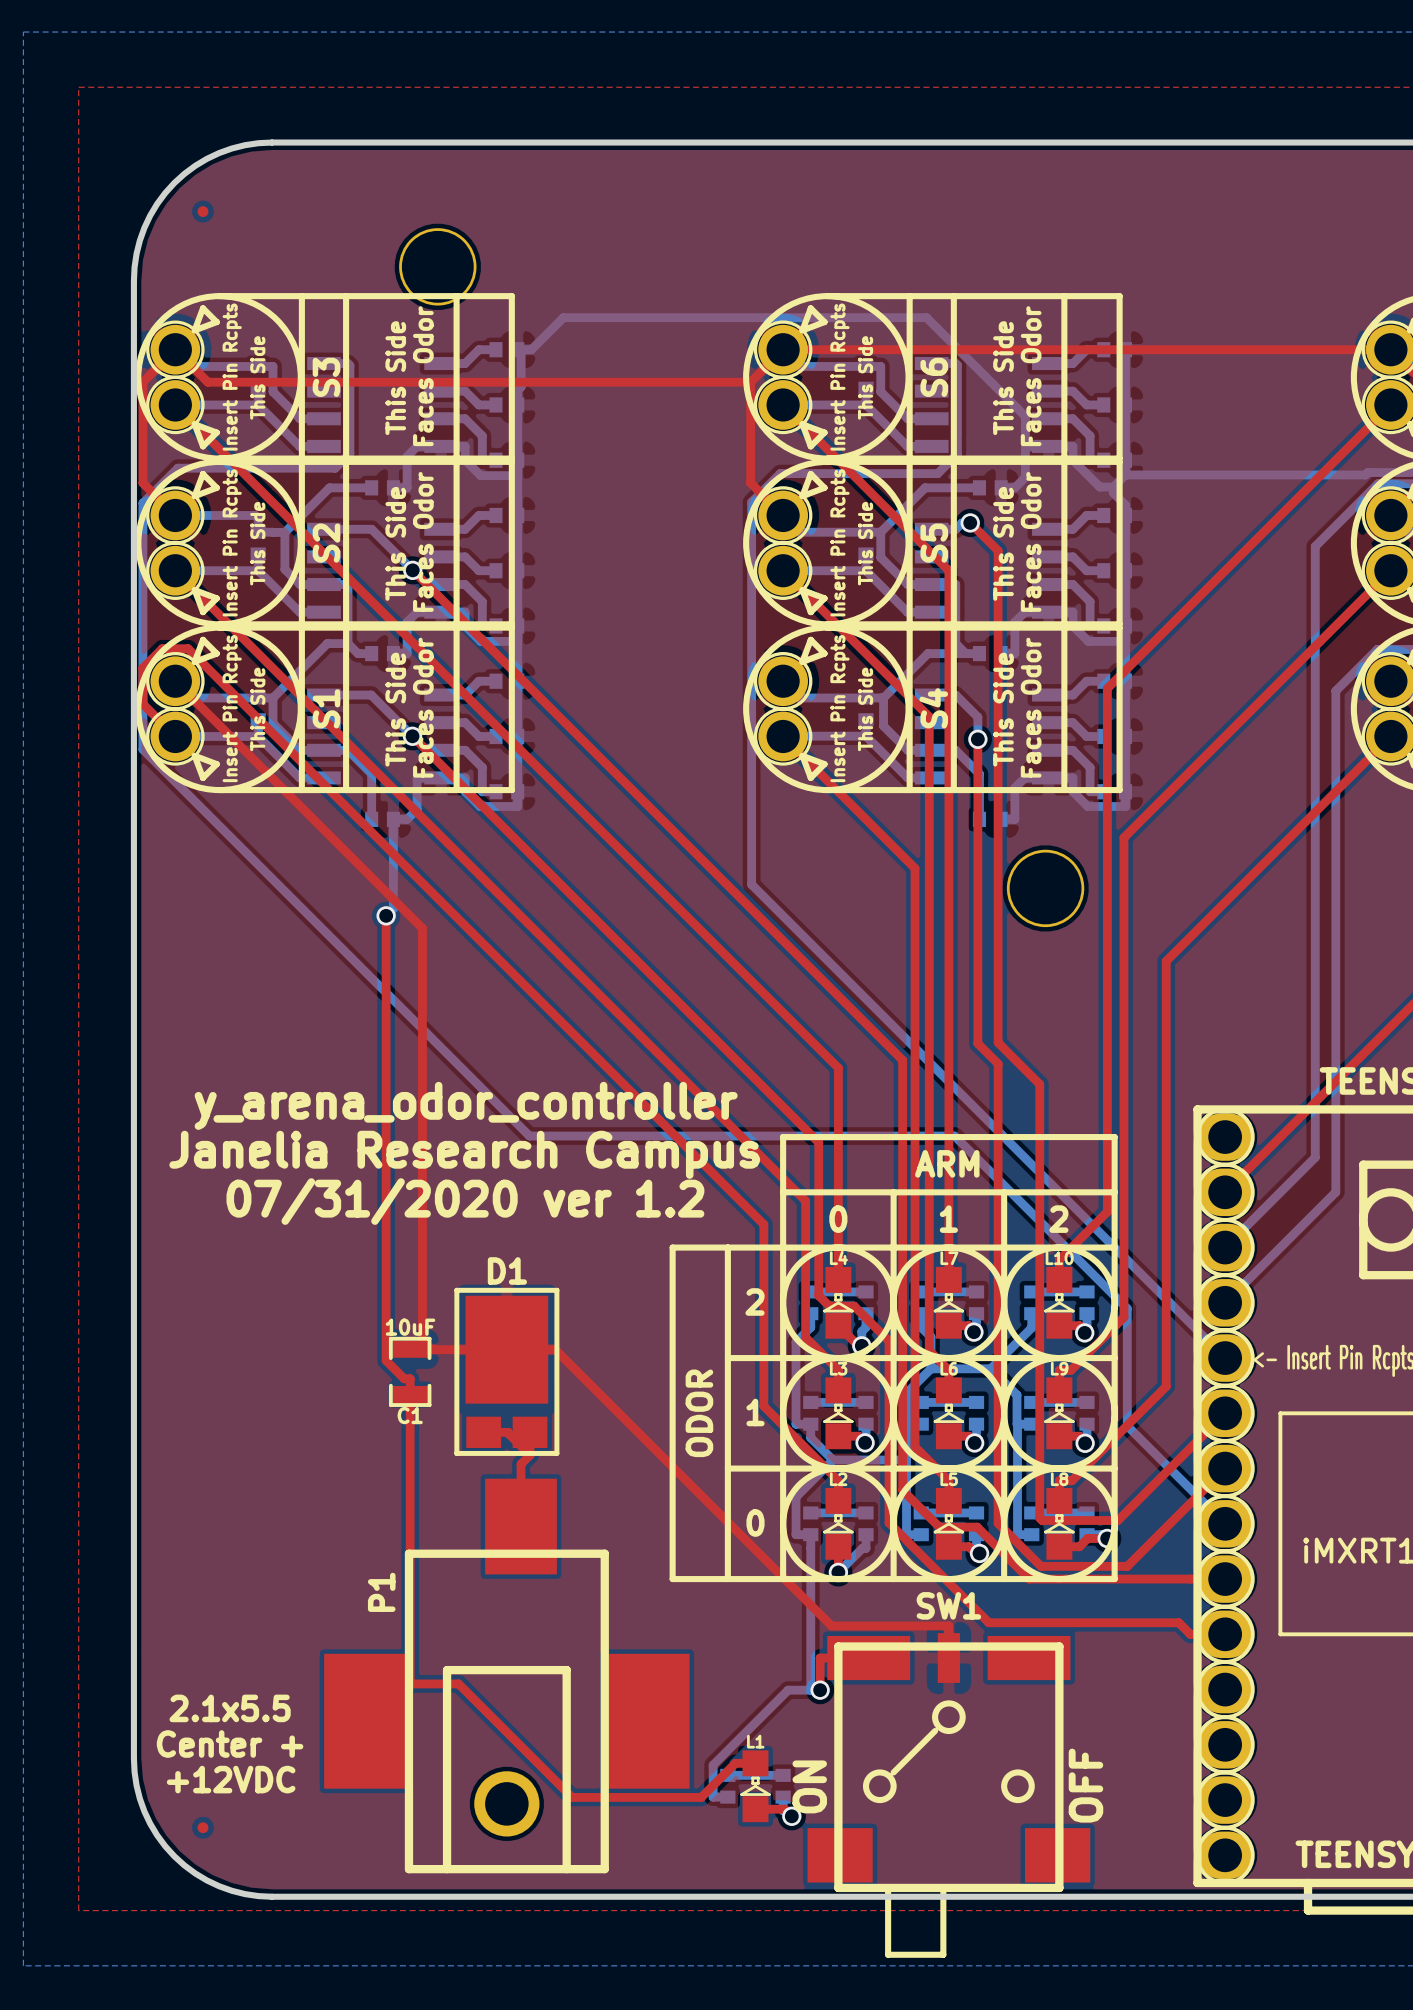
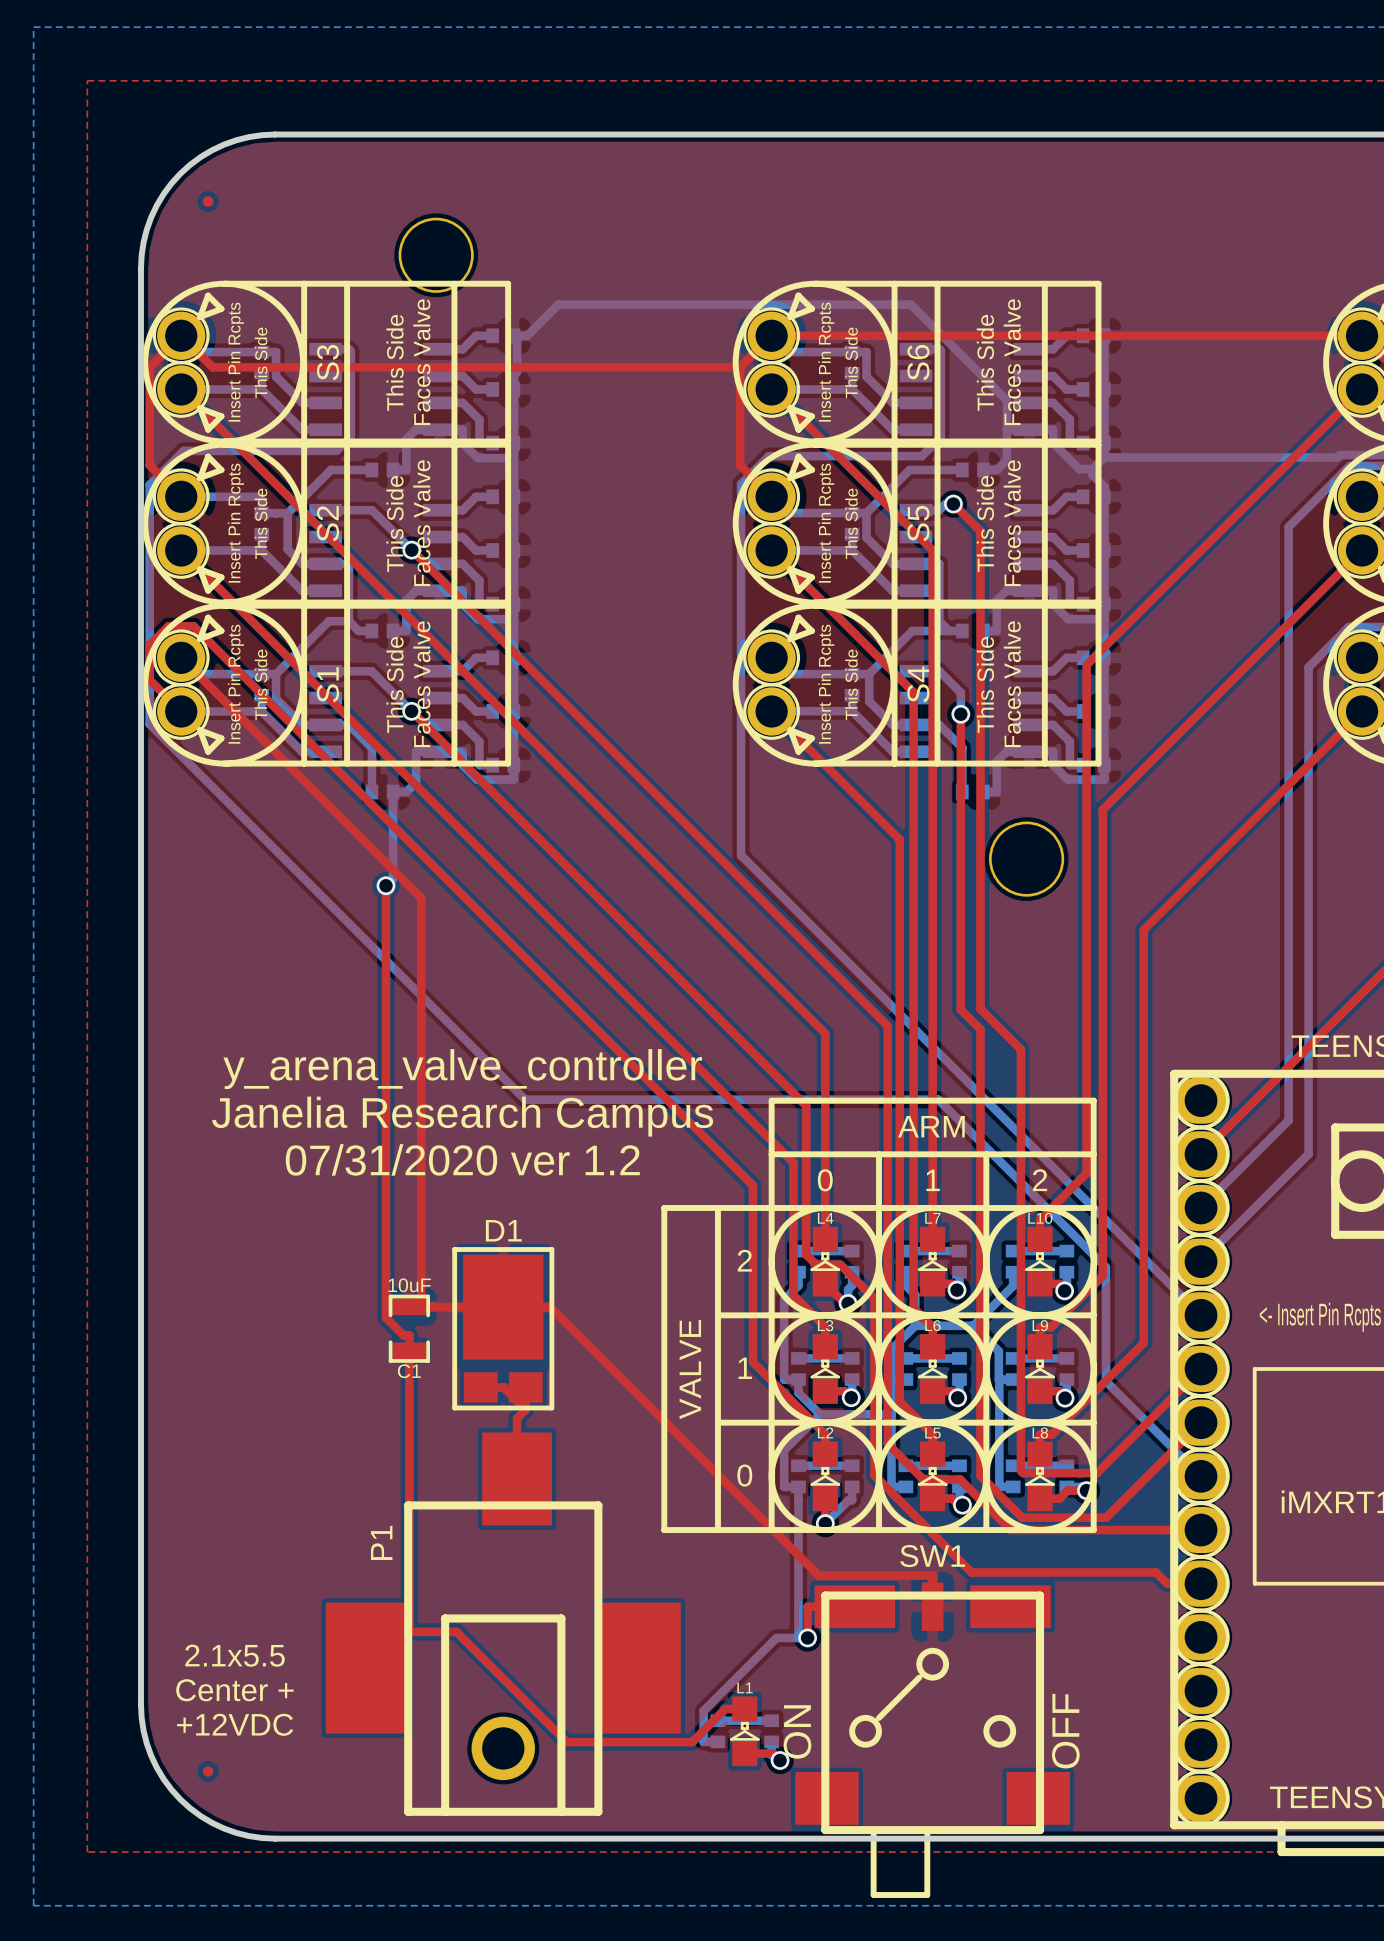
S3 text: Faces Odor (423, 376) -> Faces Valve (421, 362)
S6 text: Faces Odor (1031, 376) -> Faces Valve (1012, 362)
S2 text: Faces Odor (423, 541) -> Faces Valve (421, 523)
S5 text: Faces Odor (1031, 541) -> Faces Valve (1012, 523)
S1 text: Faces Odor (423, 707) -> Faces Valve (421, 684)
S4 text: Faces Odor (1031, 707) -> Faces Valve (1012, 684)
text: y_arena_odor_controller (466, 1105) -> y_arena_valve_controller (462, 1069)
text: ODOR (699, 1413) -> VALVE (690, 1369)

